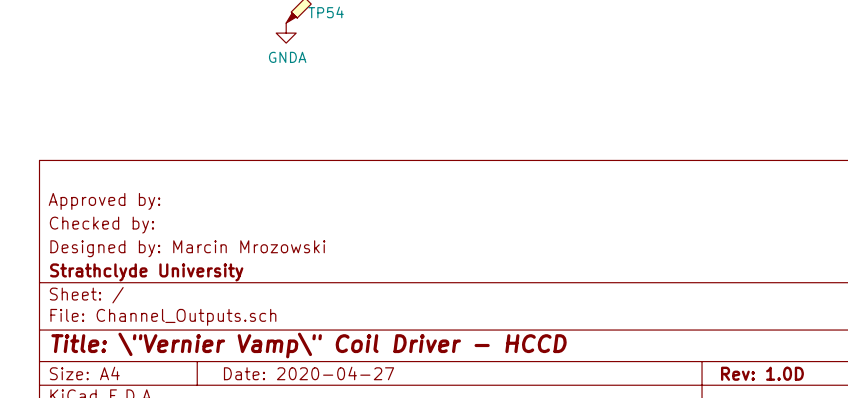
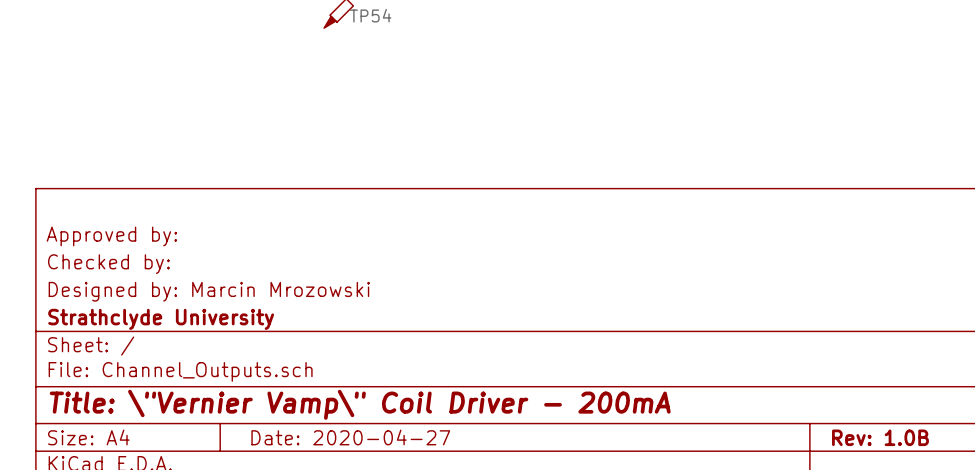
power symbol: GNDA (286, 33) -> none
title block: Title: \"Vernier Vamp\" Coil Driver - HCCD (309, 345) -> Title: \"Vernier Vamp\" Coil Driver - 200mA (360, 404)
title block: Rev: 1.0D (762, 373) -> Rev: 1.0B (880, 437)

